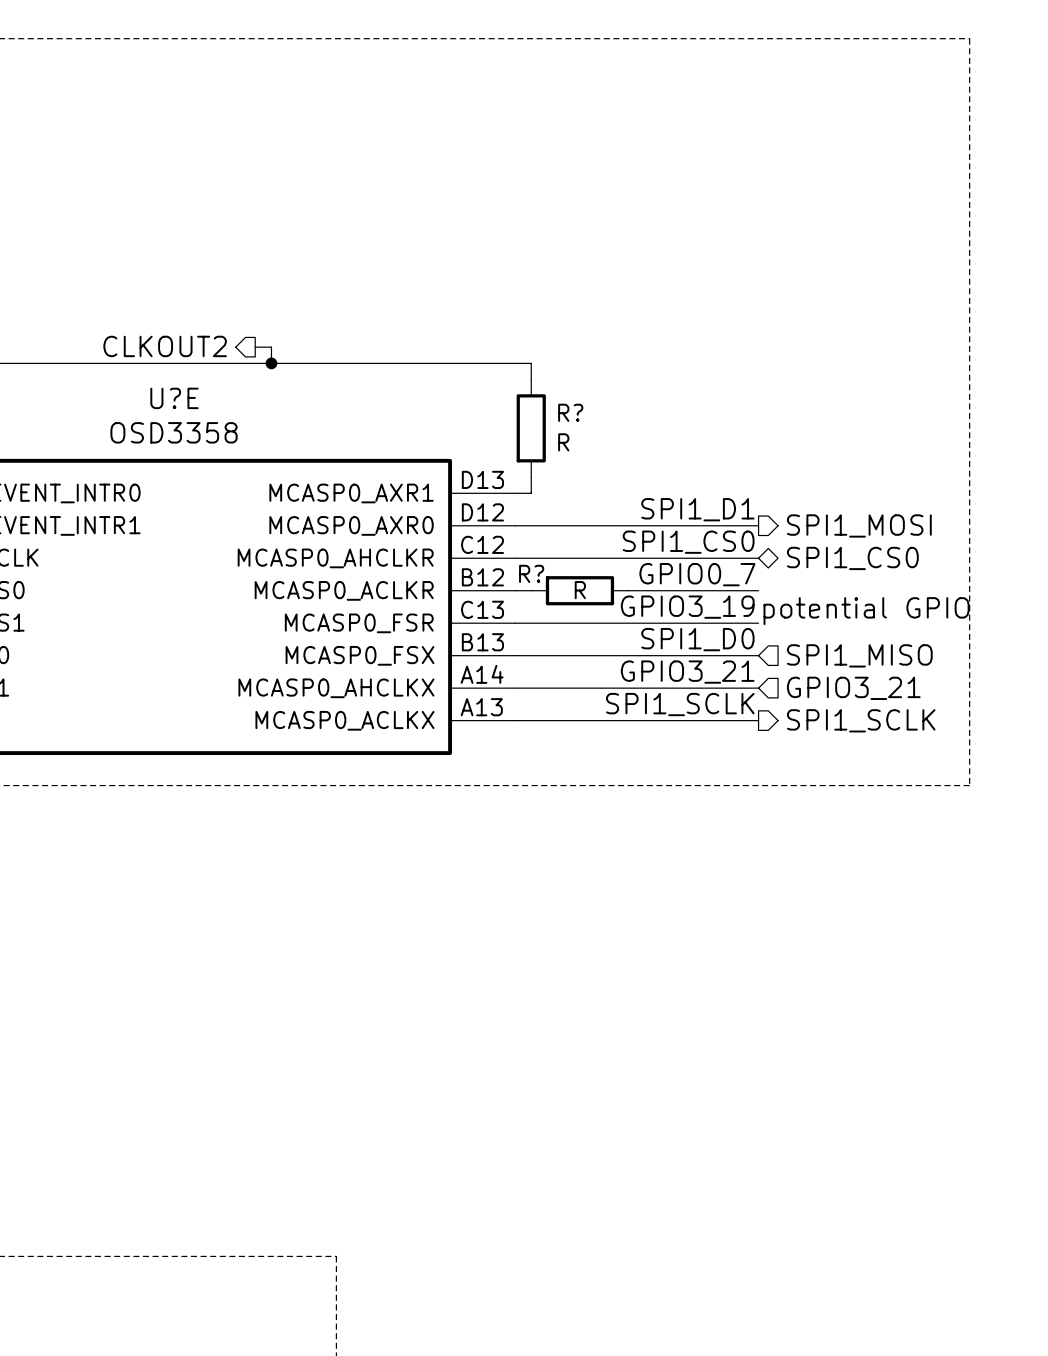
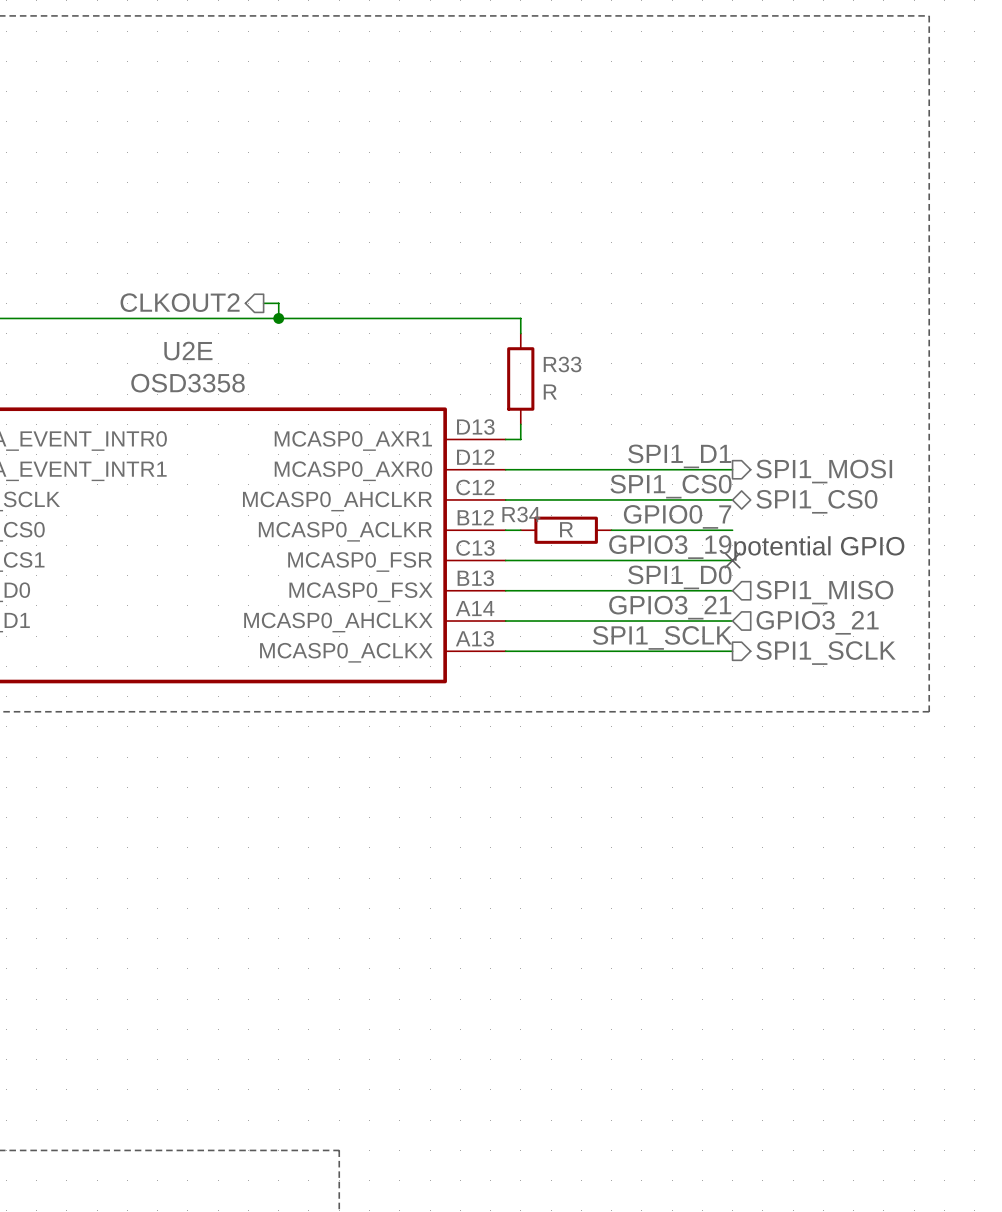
U?E name: U?E (174, 398) -> U2E (188, 351)
R? name: R? (570, 412) -> R33 (562, 364)
R? name: R? (531, 573) -> R34 (521, 514)
no-connect mark: none -> (732, 560)

